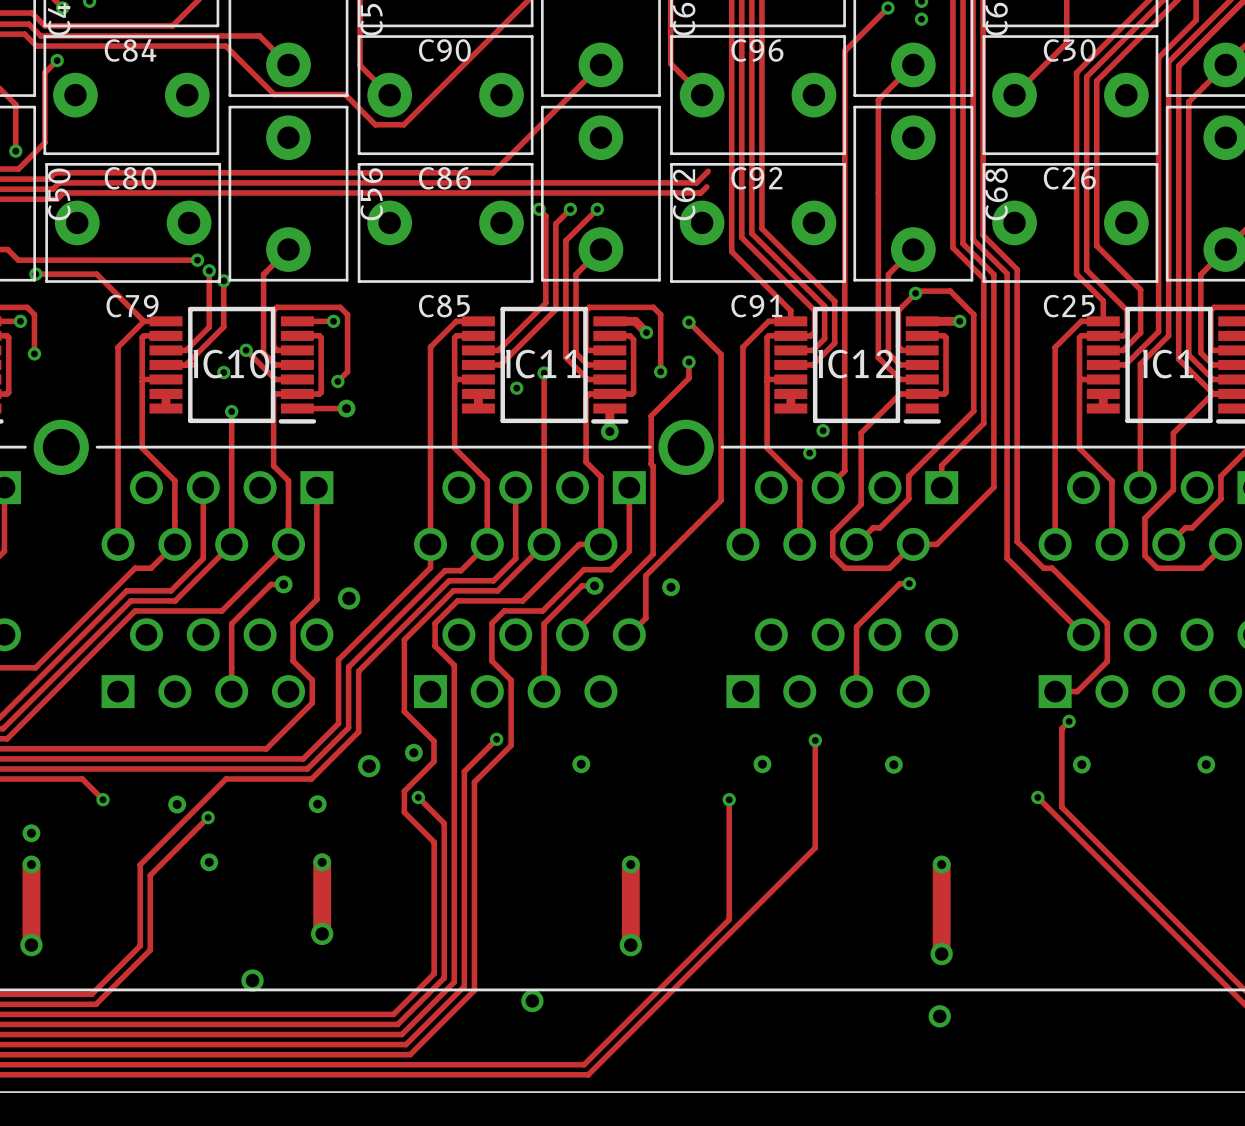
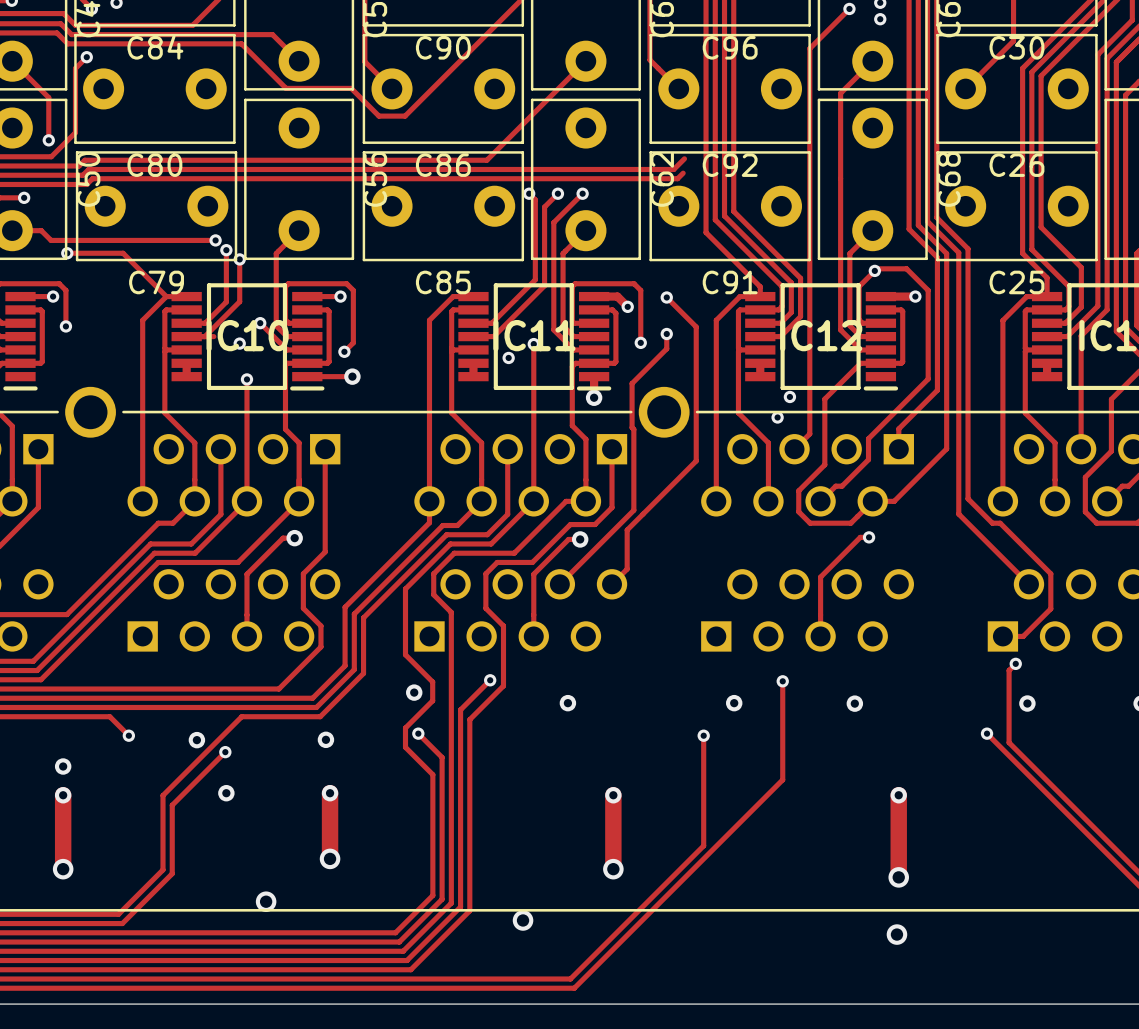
via: (671, 587) -> none
via: (349, 598) -> none
via: (369, 766) -> none

